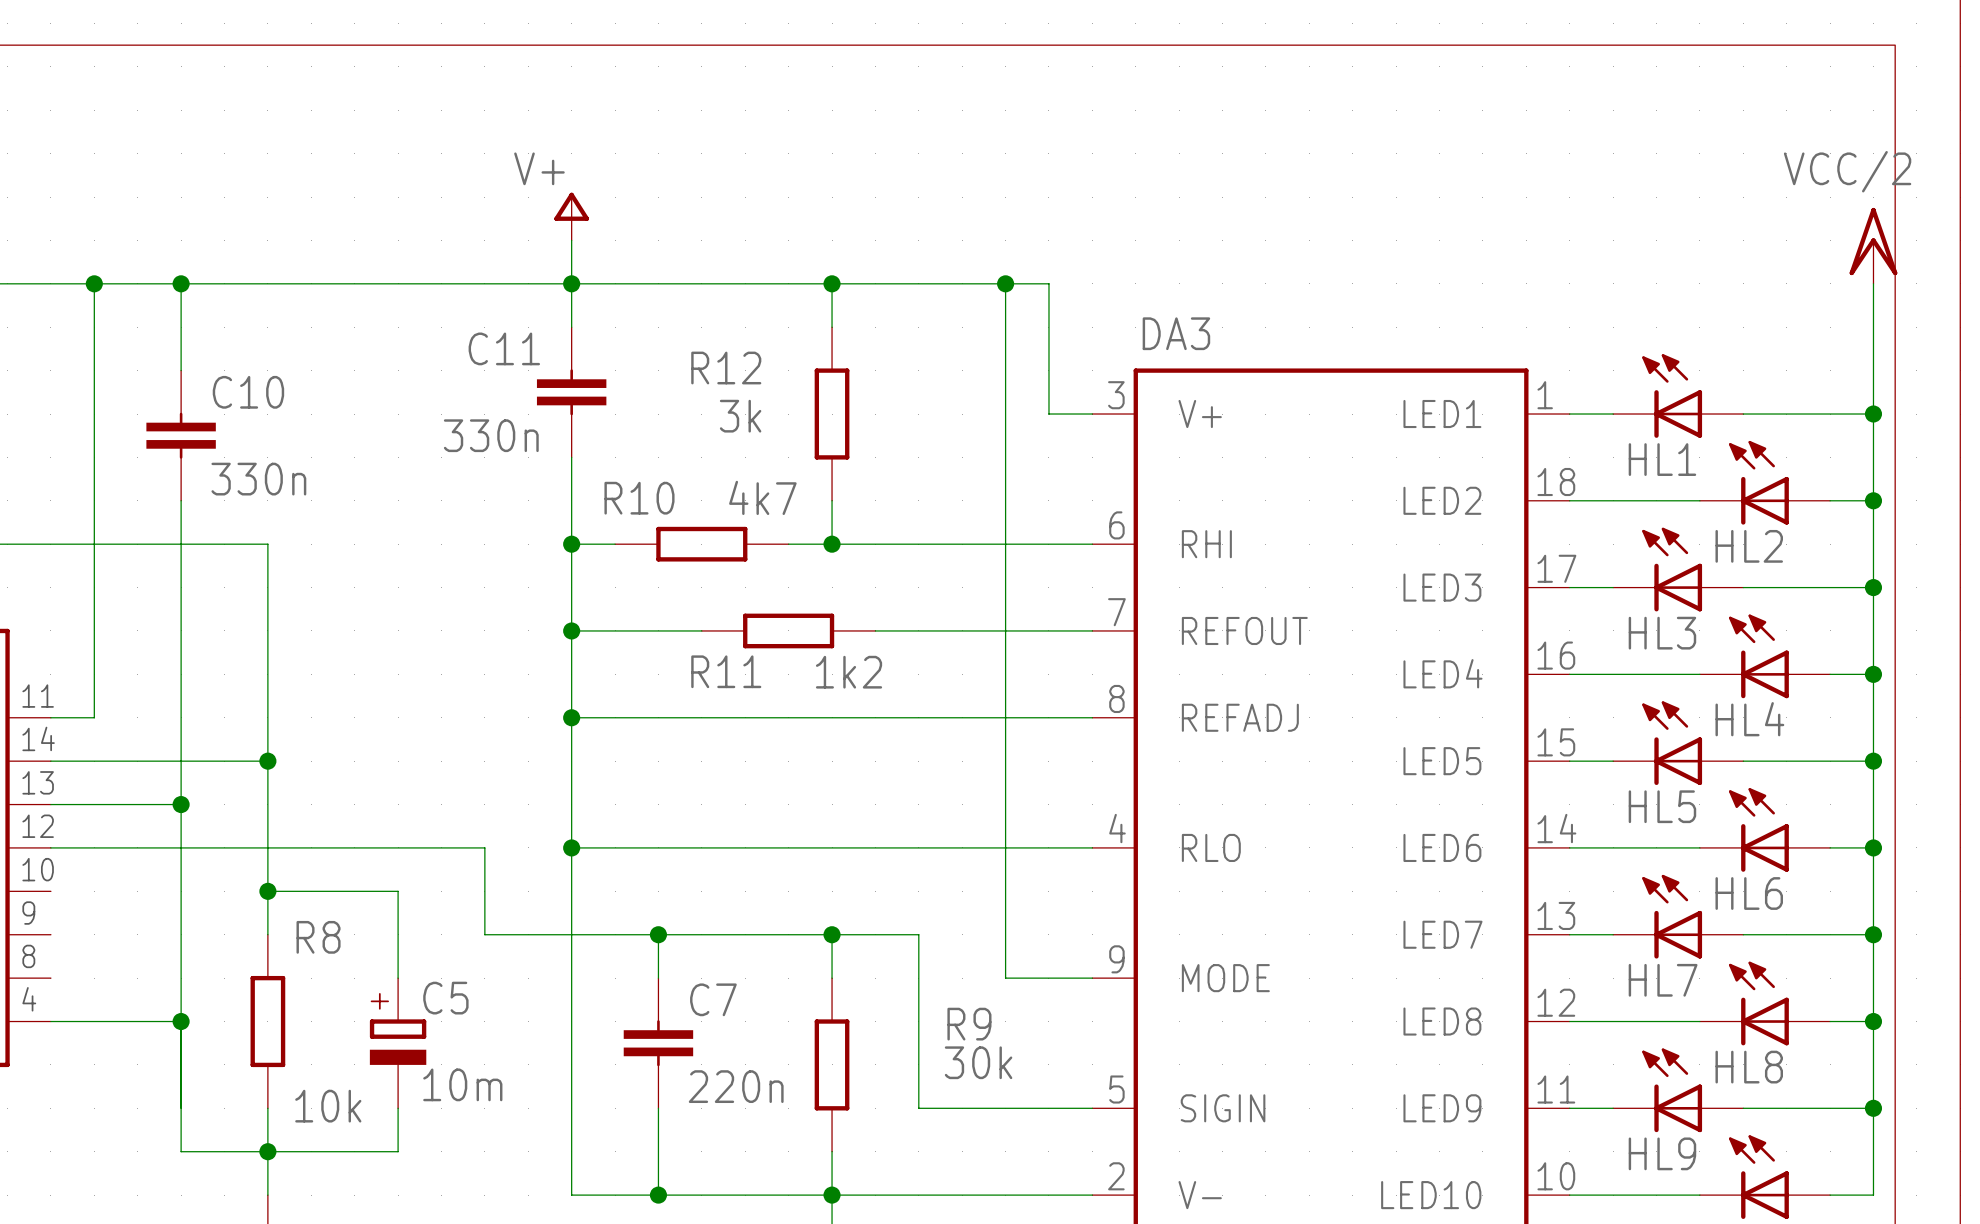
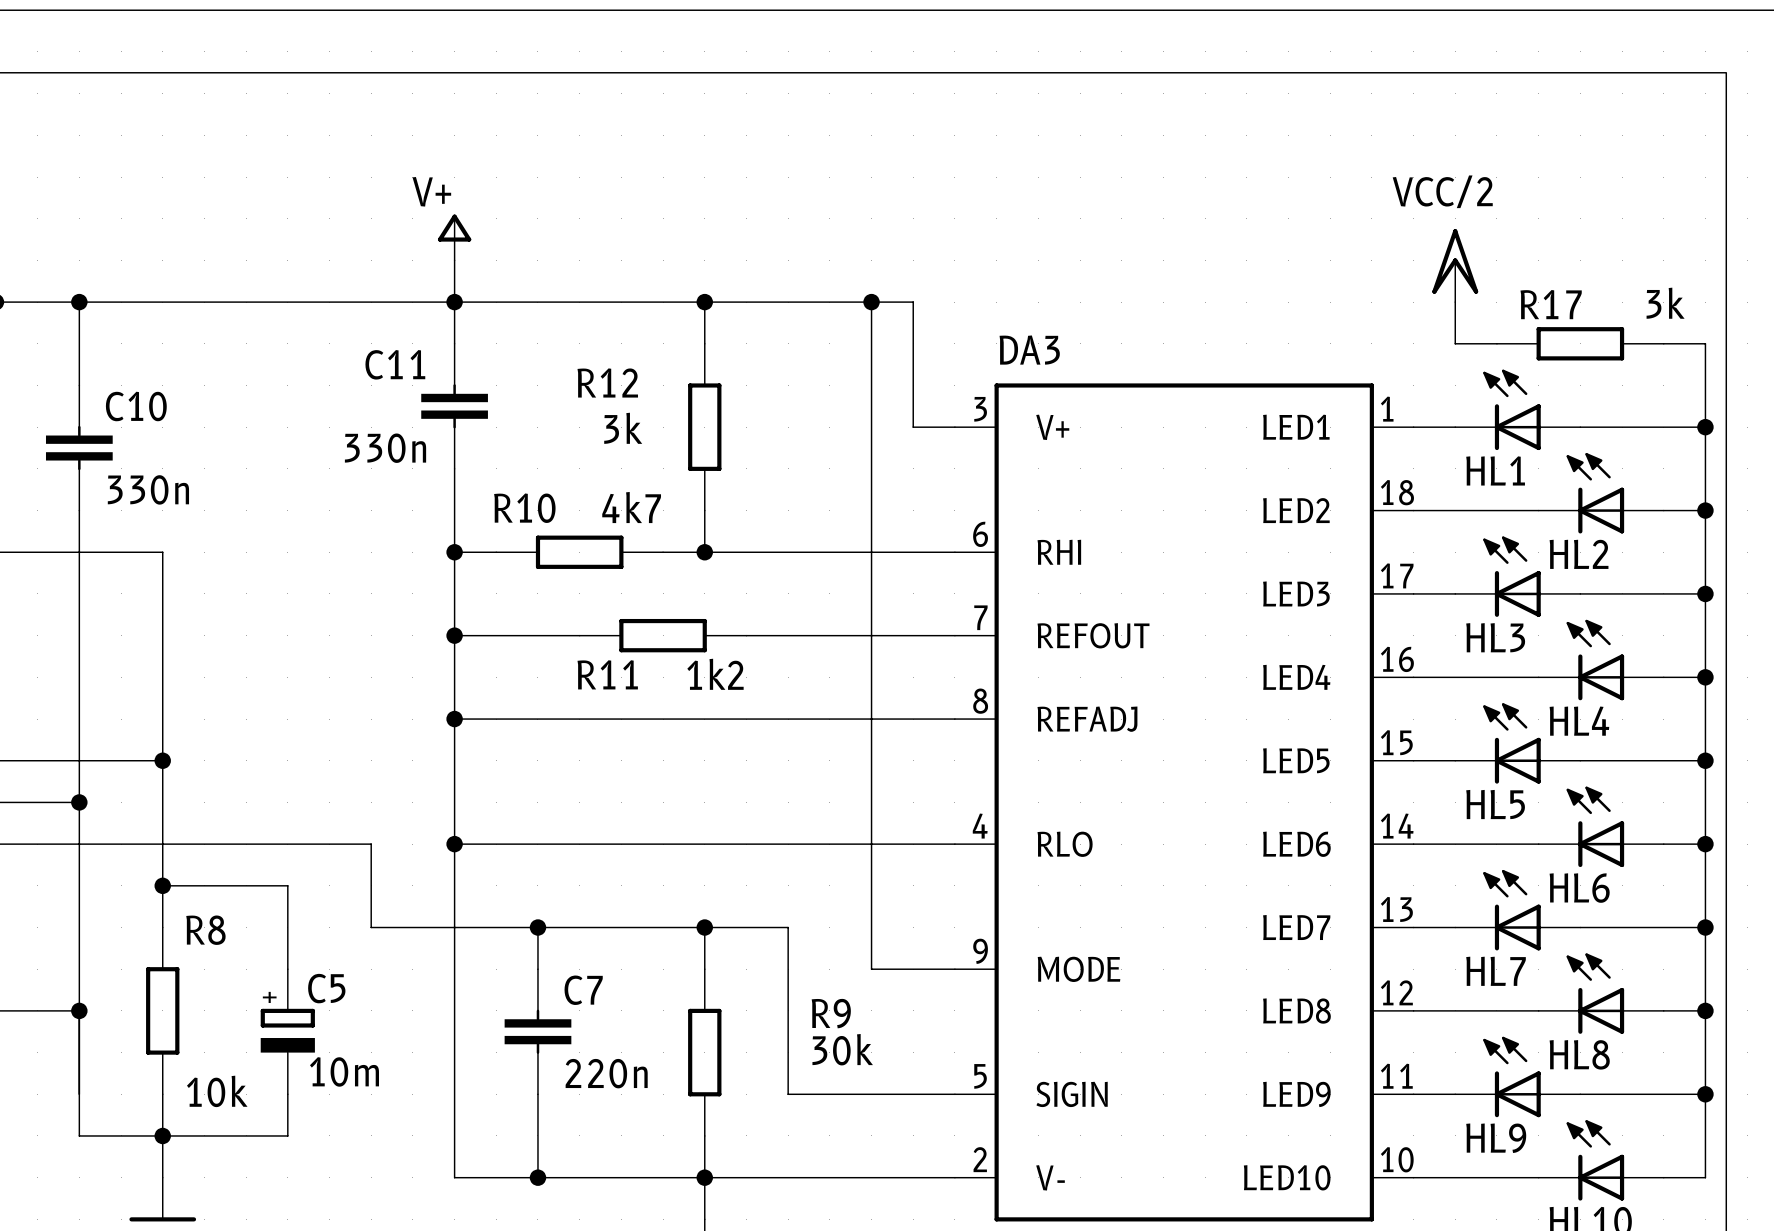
power symbol position: VCC/2 (1873, 245) -> VCC/2 (1455, 265)
wire: none -> (1455, 302) (1455, 343) (1496, 343)
wire: (1873, 283) (1873, 327) -> (1663, 343) (1705, 343)
R17: none -> 3k (1580, 343)

